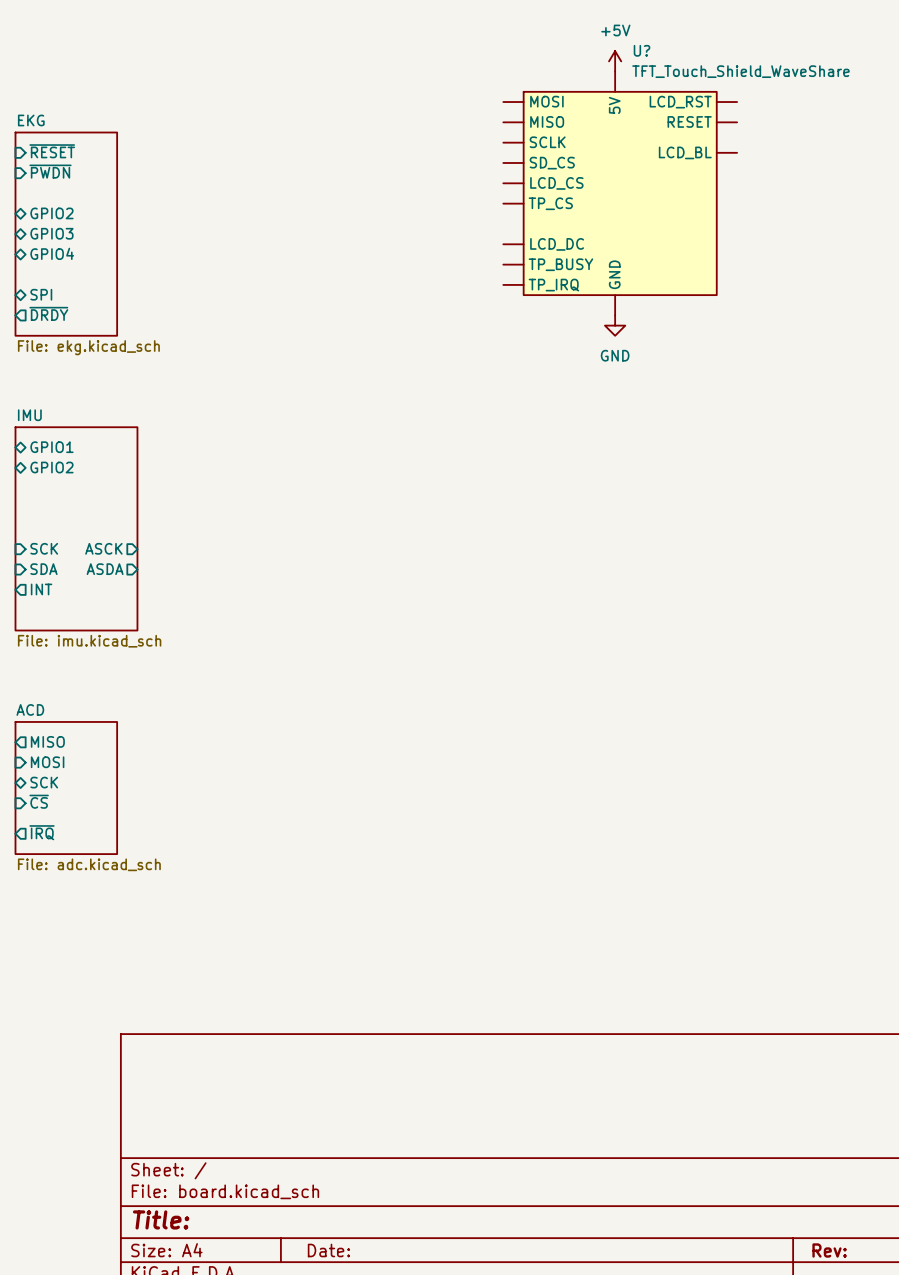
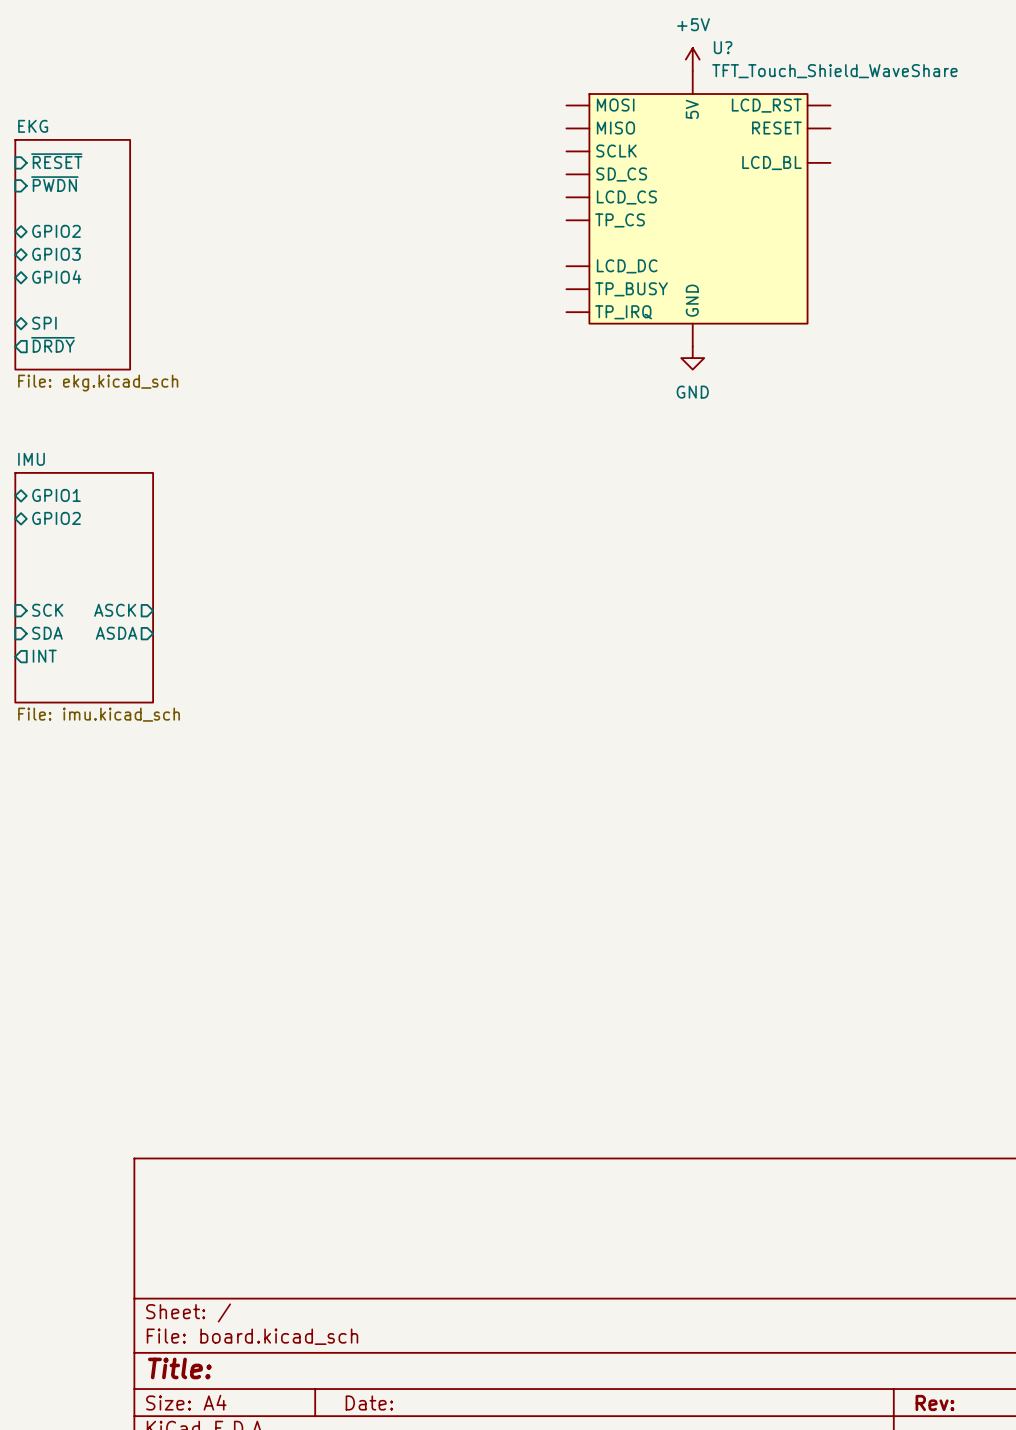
sheet pin: MISO (47, 741) -> none
sheet pin: MOSI (47, 762) -> none
sheet pin: SCK (44, 782) -> none
sheet ACD: File: adc.kicad_sch (66, 788) -> none
sheet pin: ~{CS} (39, 801) -> none
sheet pin: ~{IRQ} (42, 832) -> none

